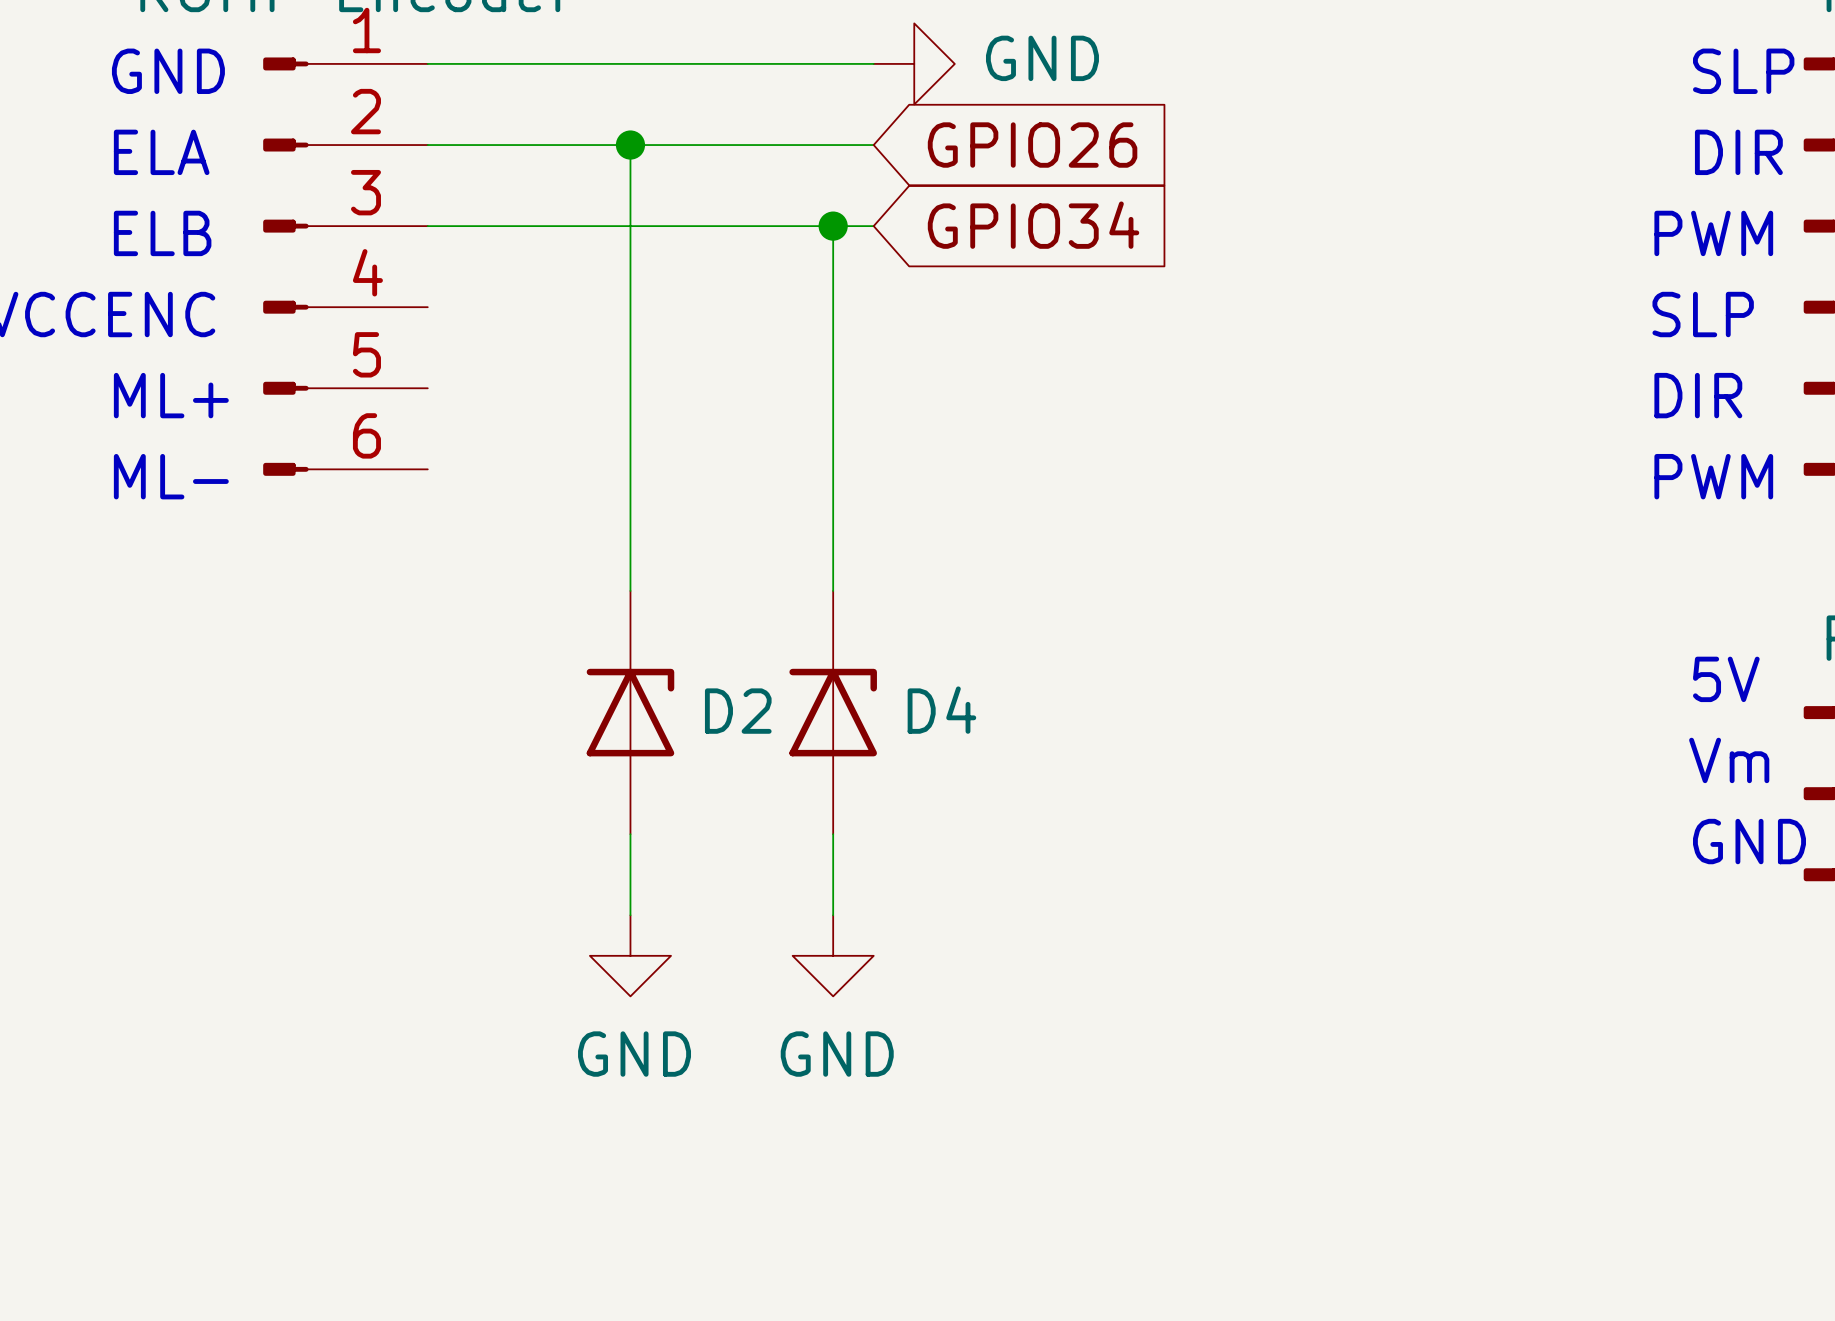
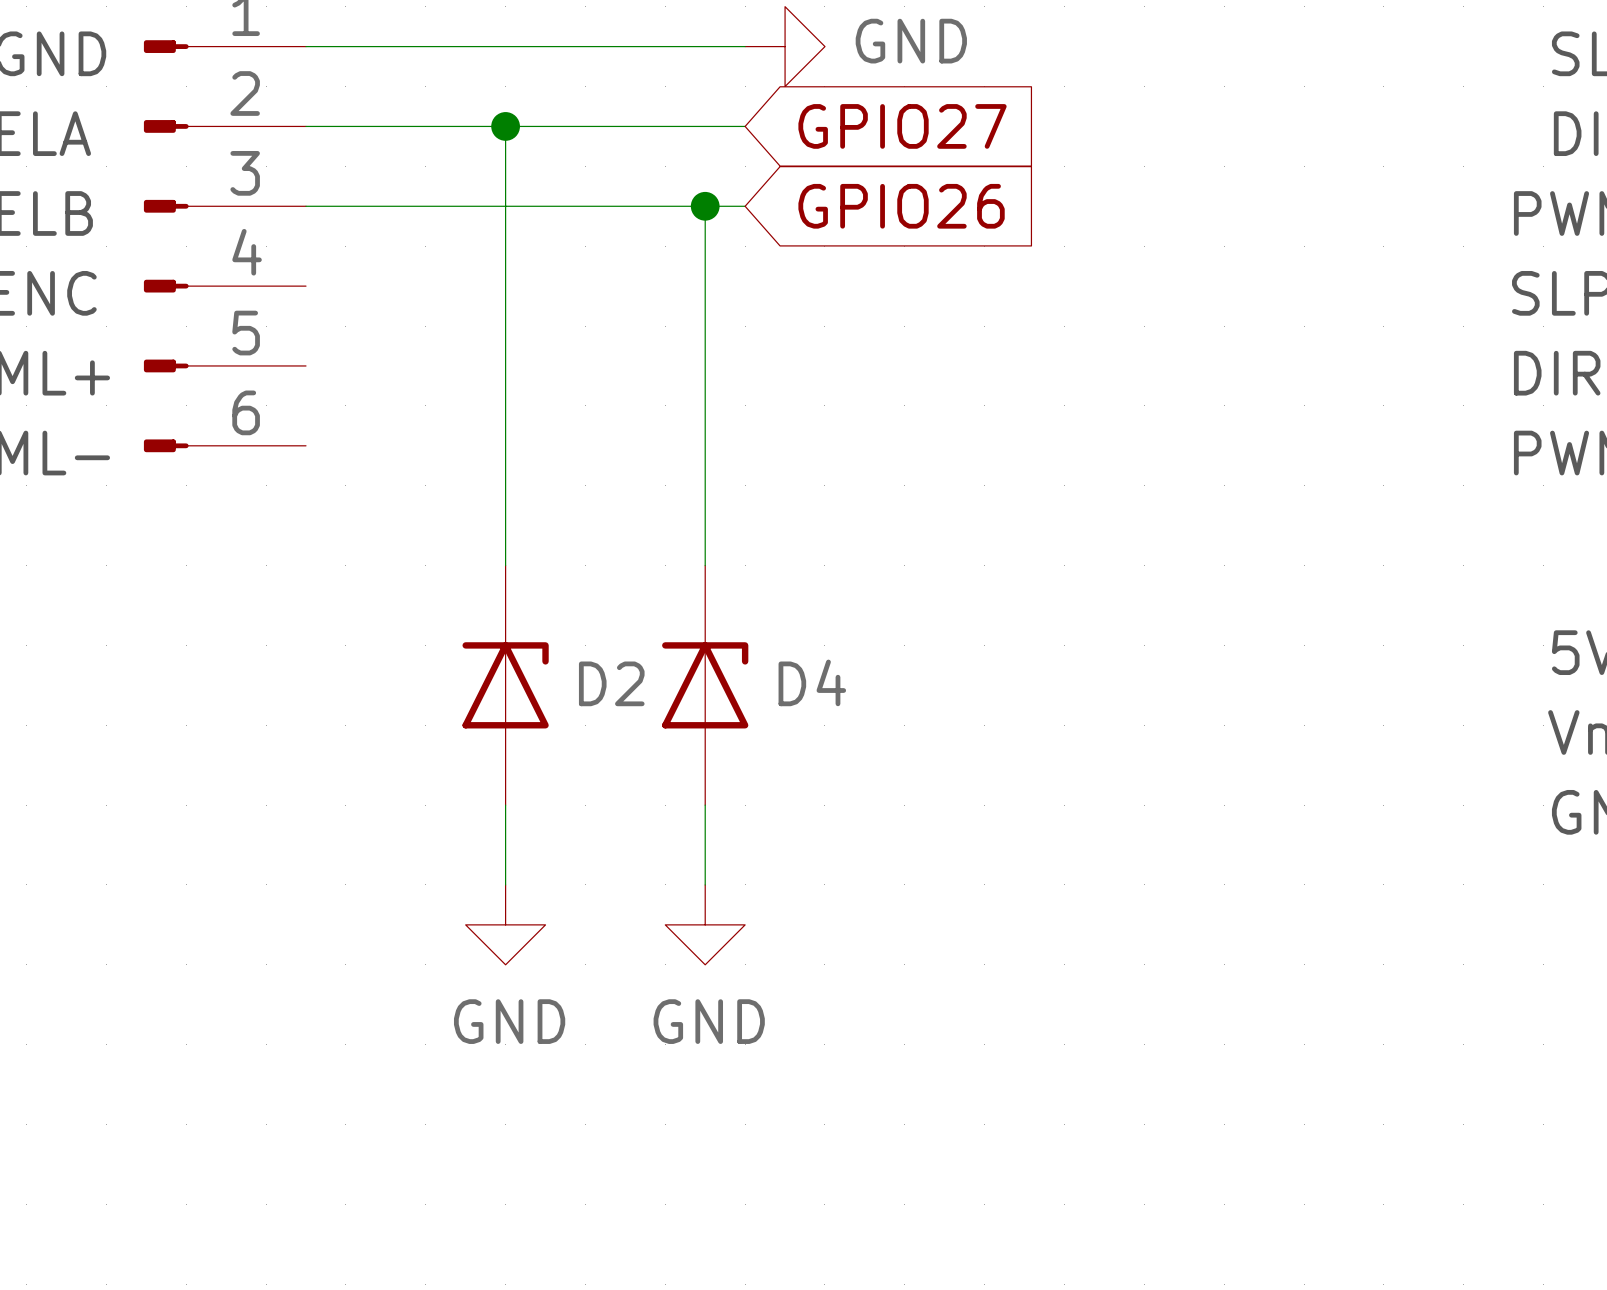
global label: GPIO26 (1032, 145) -> GPIO27 (902, 126)
global label: GPIO34 (1033, 225) -> GPIO26 (901, 206)

